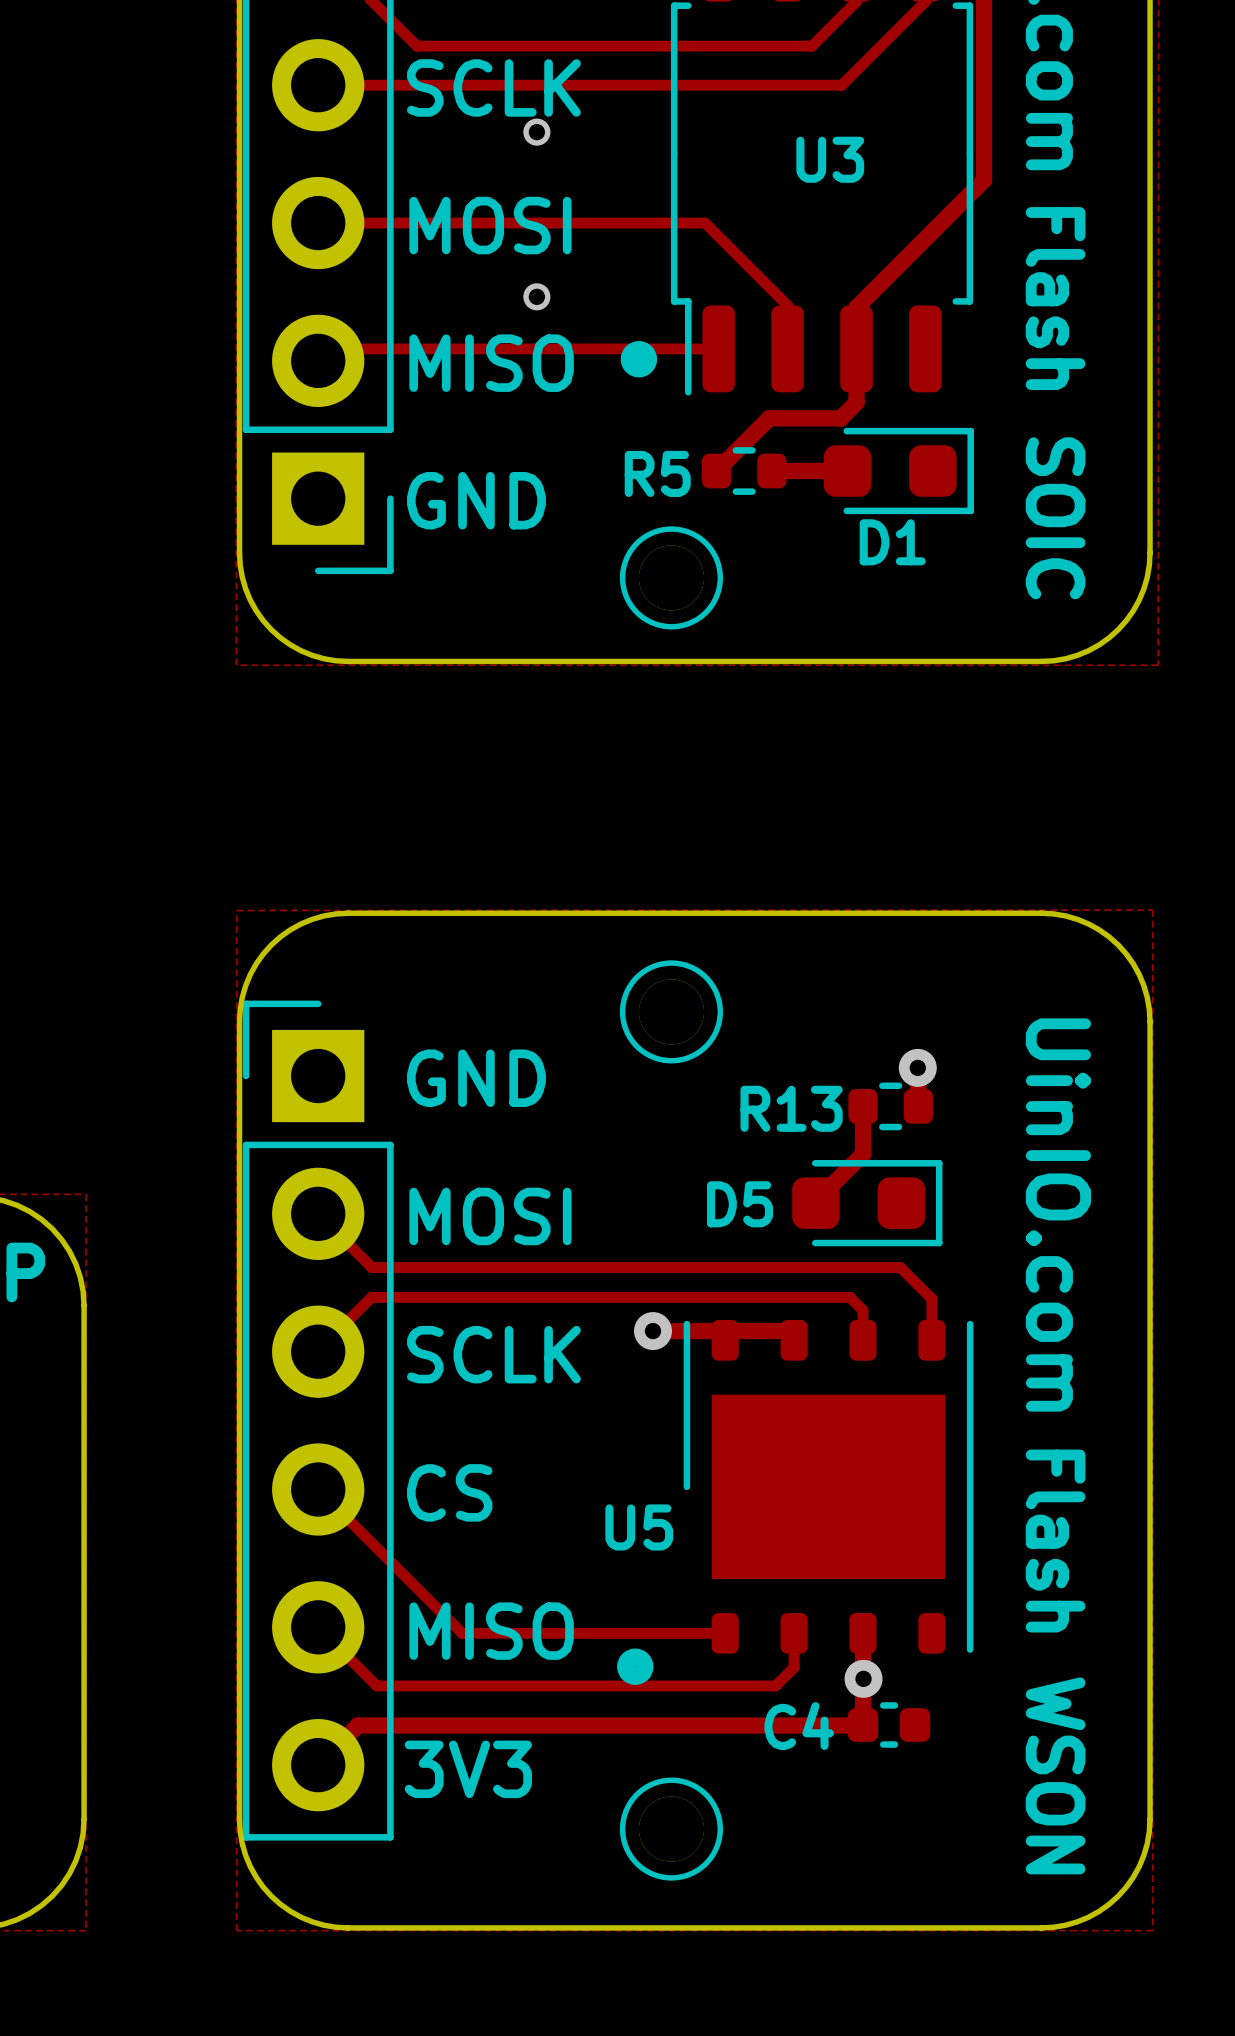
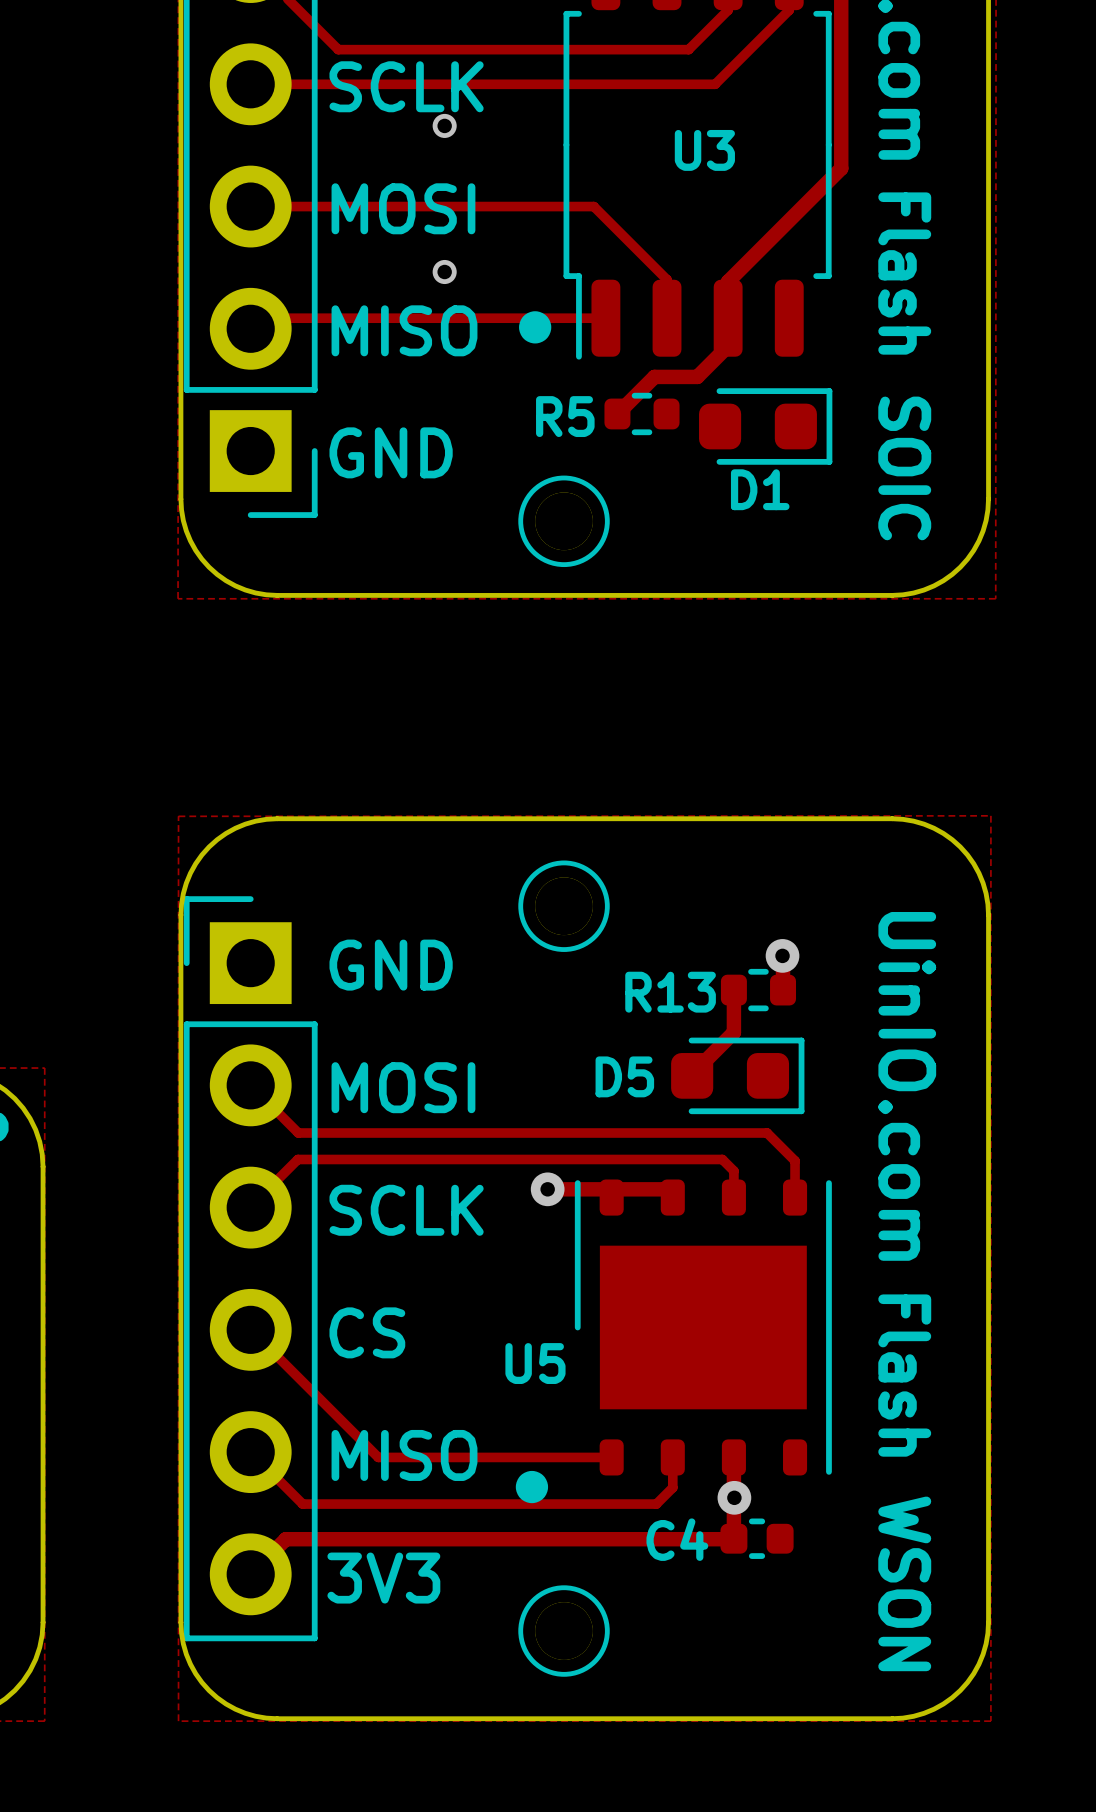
track: (856, 348) (856, 402) (840, 418) (769, 418) (716, 471) -> none
track: none -> (728, 346) (697, 376) (654, 376) (617, 413)
R5 position: (744, 471) -> (641, 413)
track: (771, 471) (847, 471) -> none

